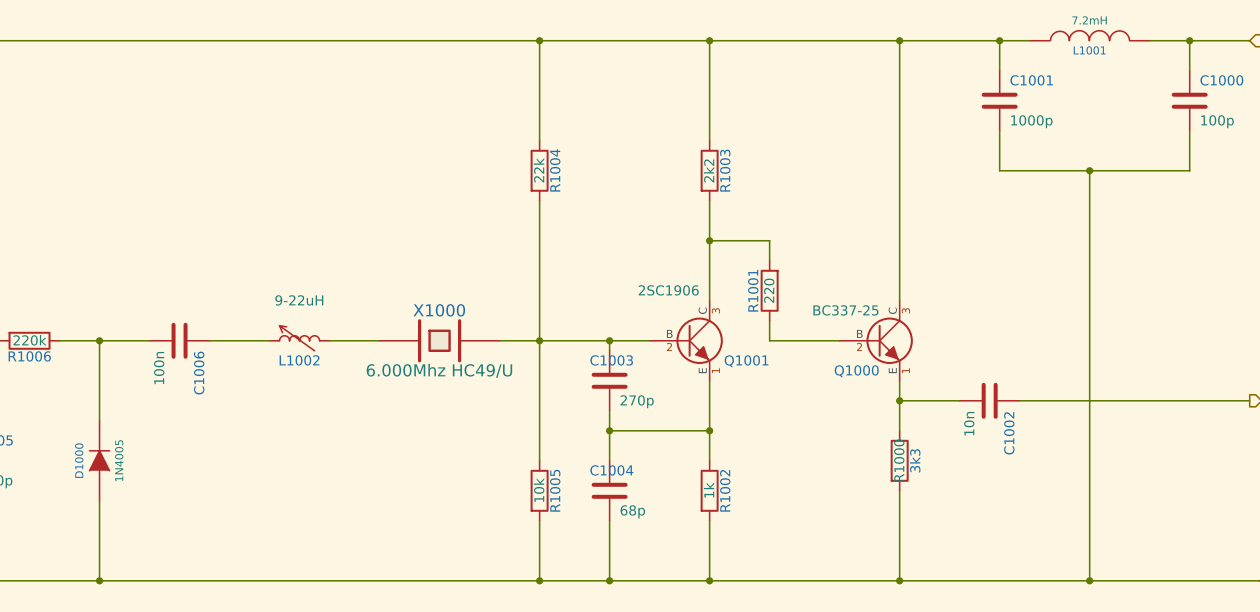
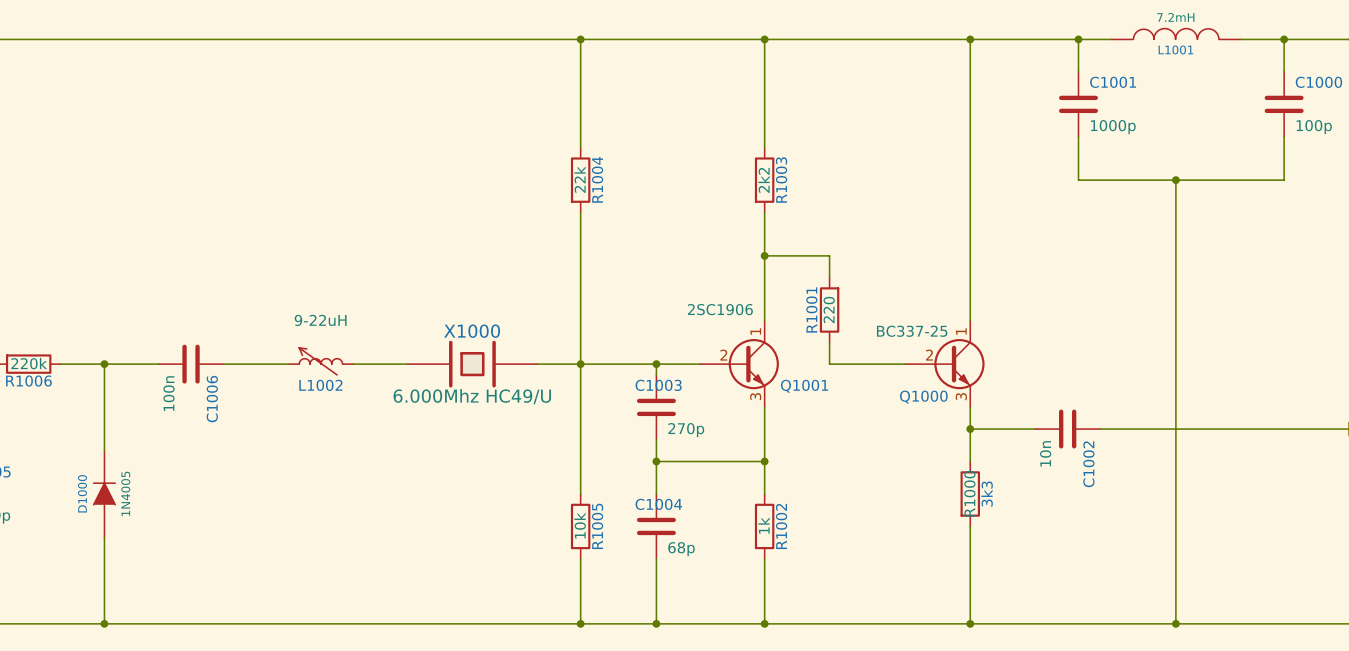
Q1001 symbol: [649, 300, 723, 381] -> [699, 320, 779, 408]
Q1000 symbol: [839, 300, 913, 381] -> [905, 320, 985, 408]

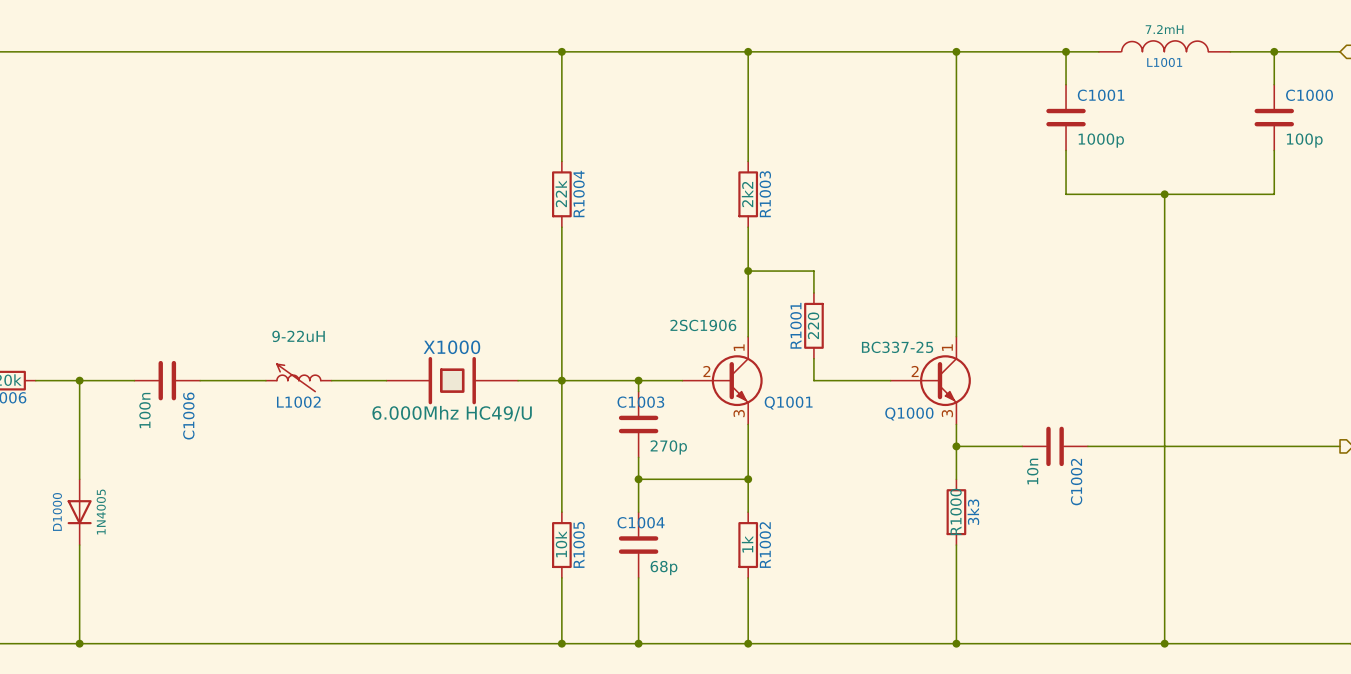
D1000 symbol: [92, 450, 116, 538] -> [67, 479, 92, 546]

